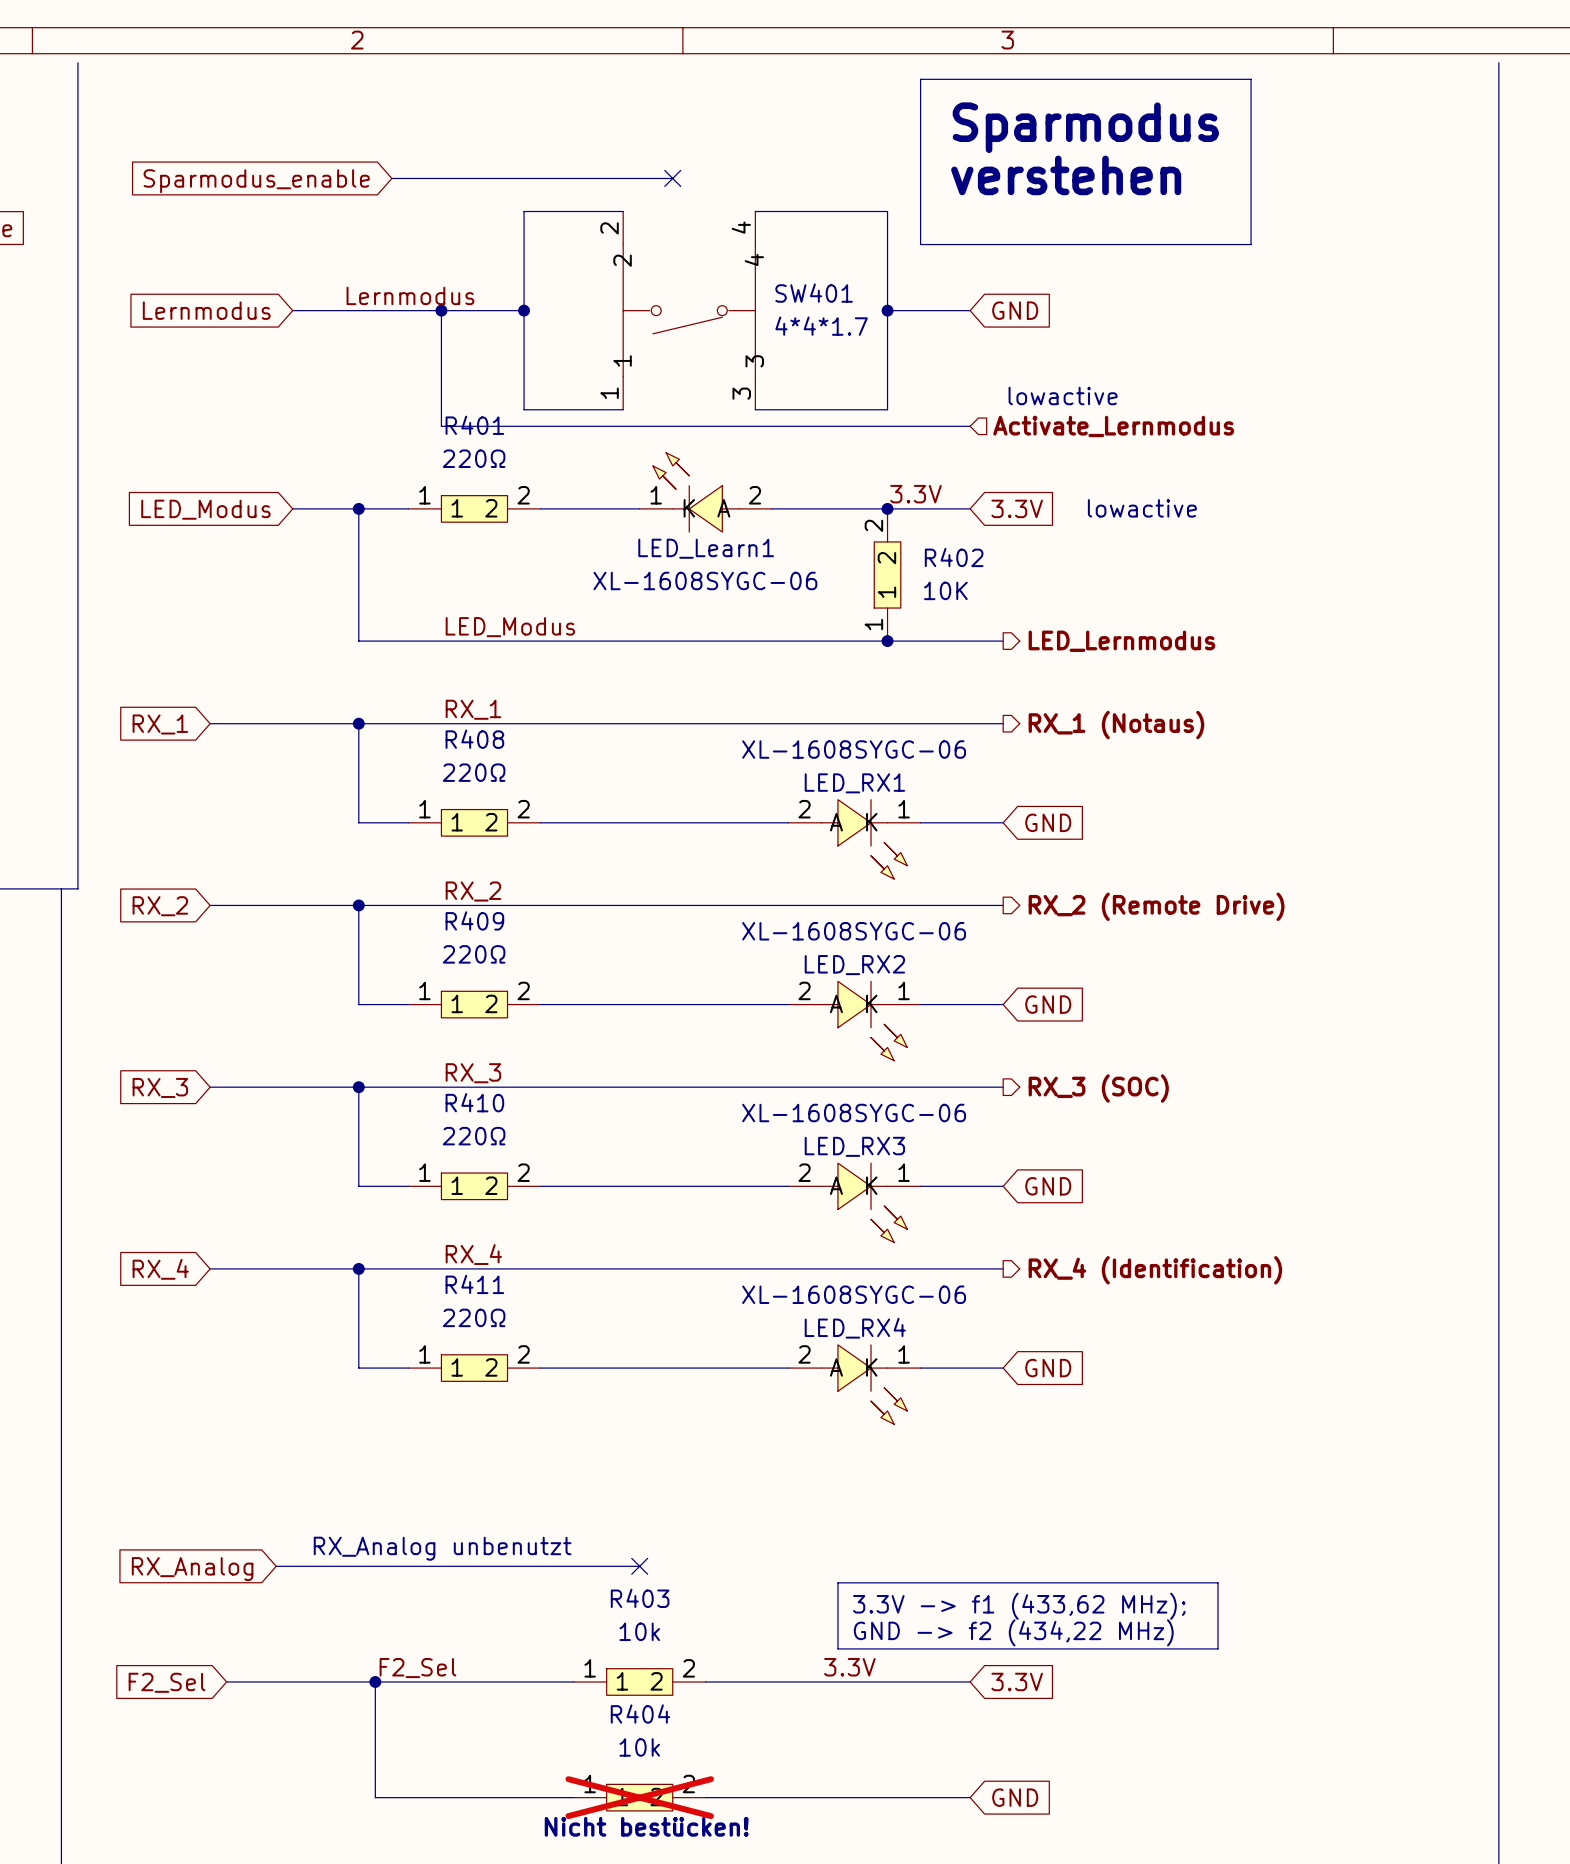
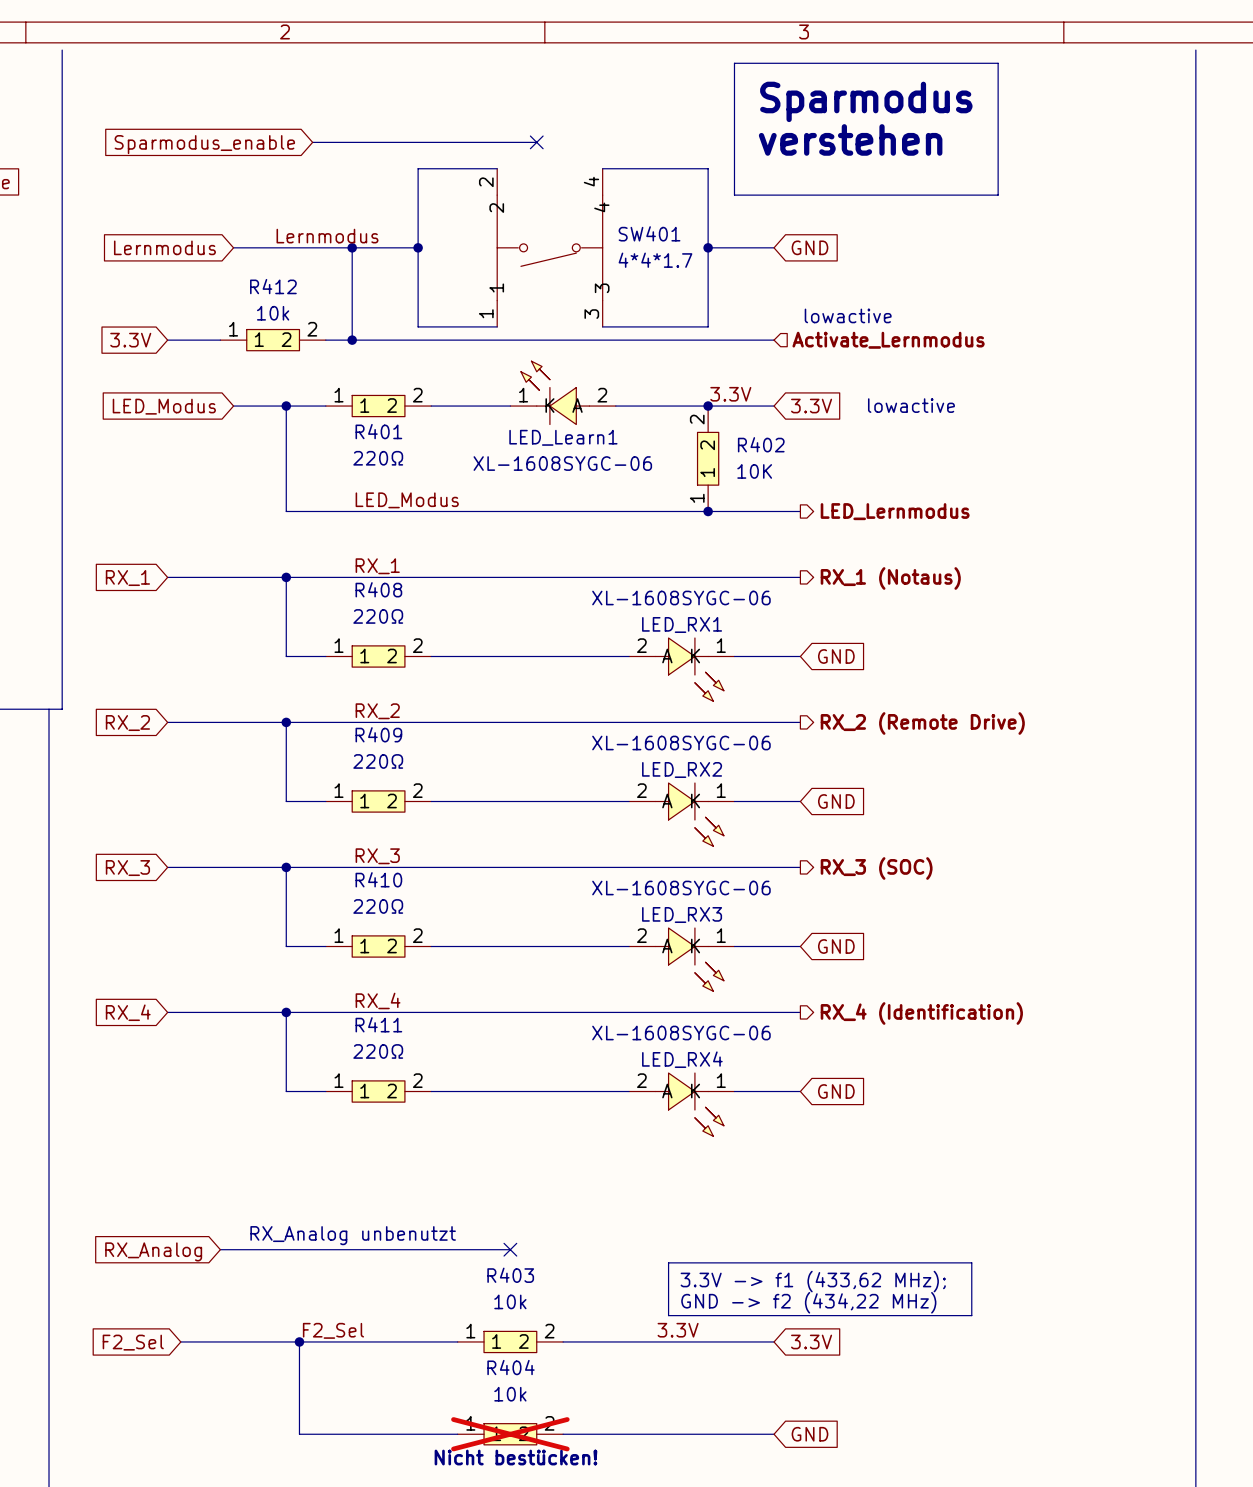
R401 name position: R401 (474, 425) -> R401 (378, 431)
global label: none -> 3.3V (130, 340)
wire: none -> (167, 340) (220, 340)
R412: none -> 10k (273, 340)
wire: none -> (325, 340) (352, 340)
junction: none -> (352, 340)
R401 value position: 220Ω (474, 458) -> 220Ω (378, 458)

